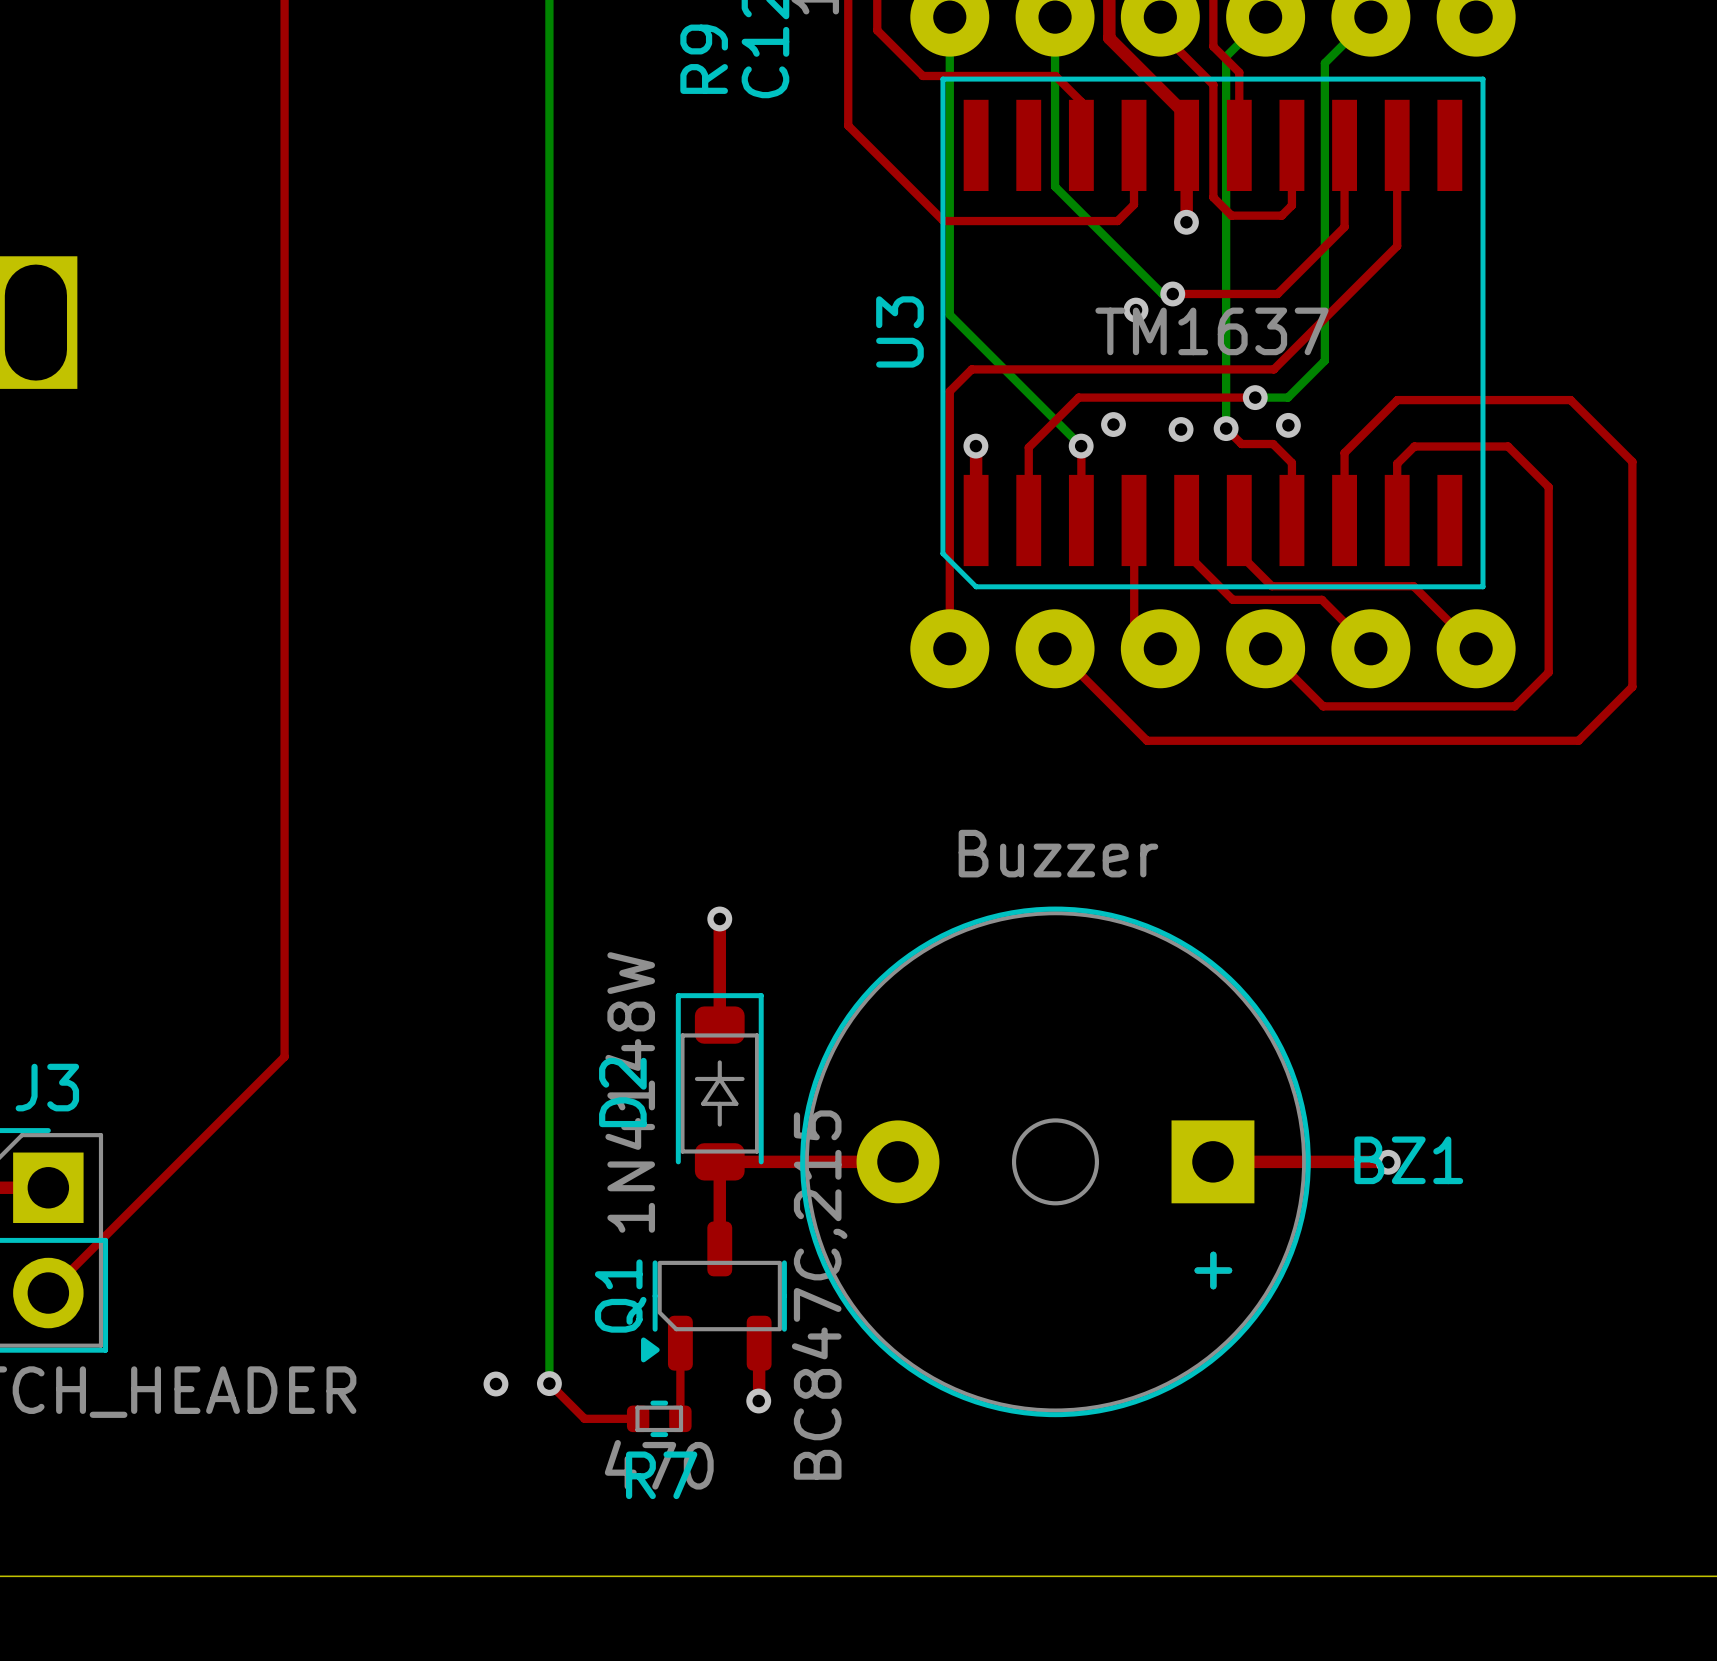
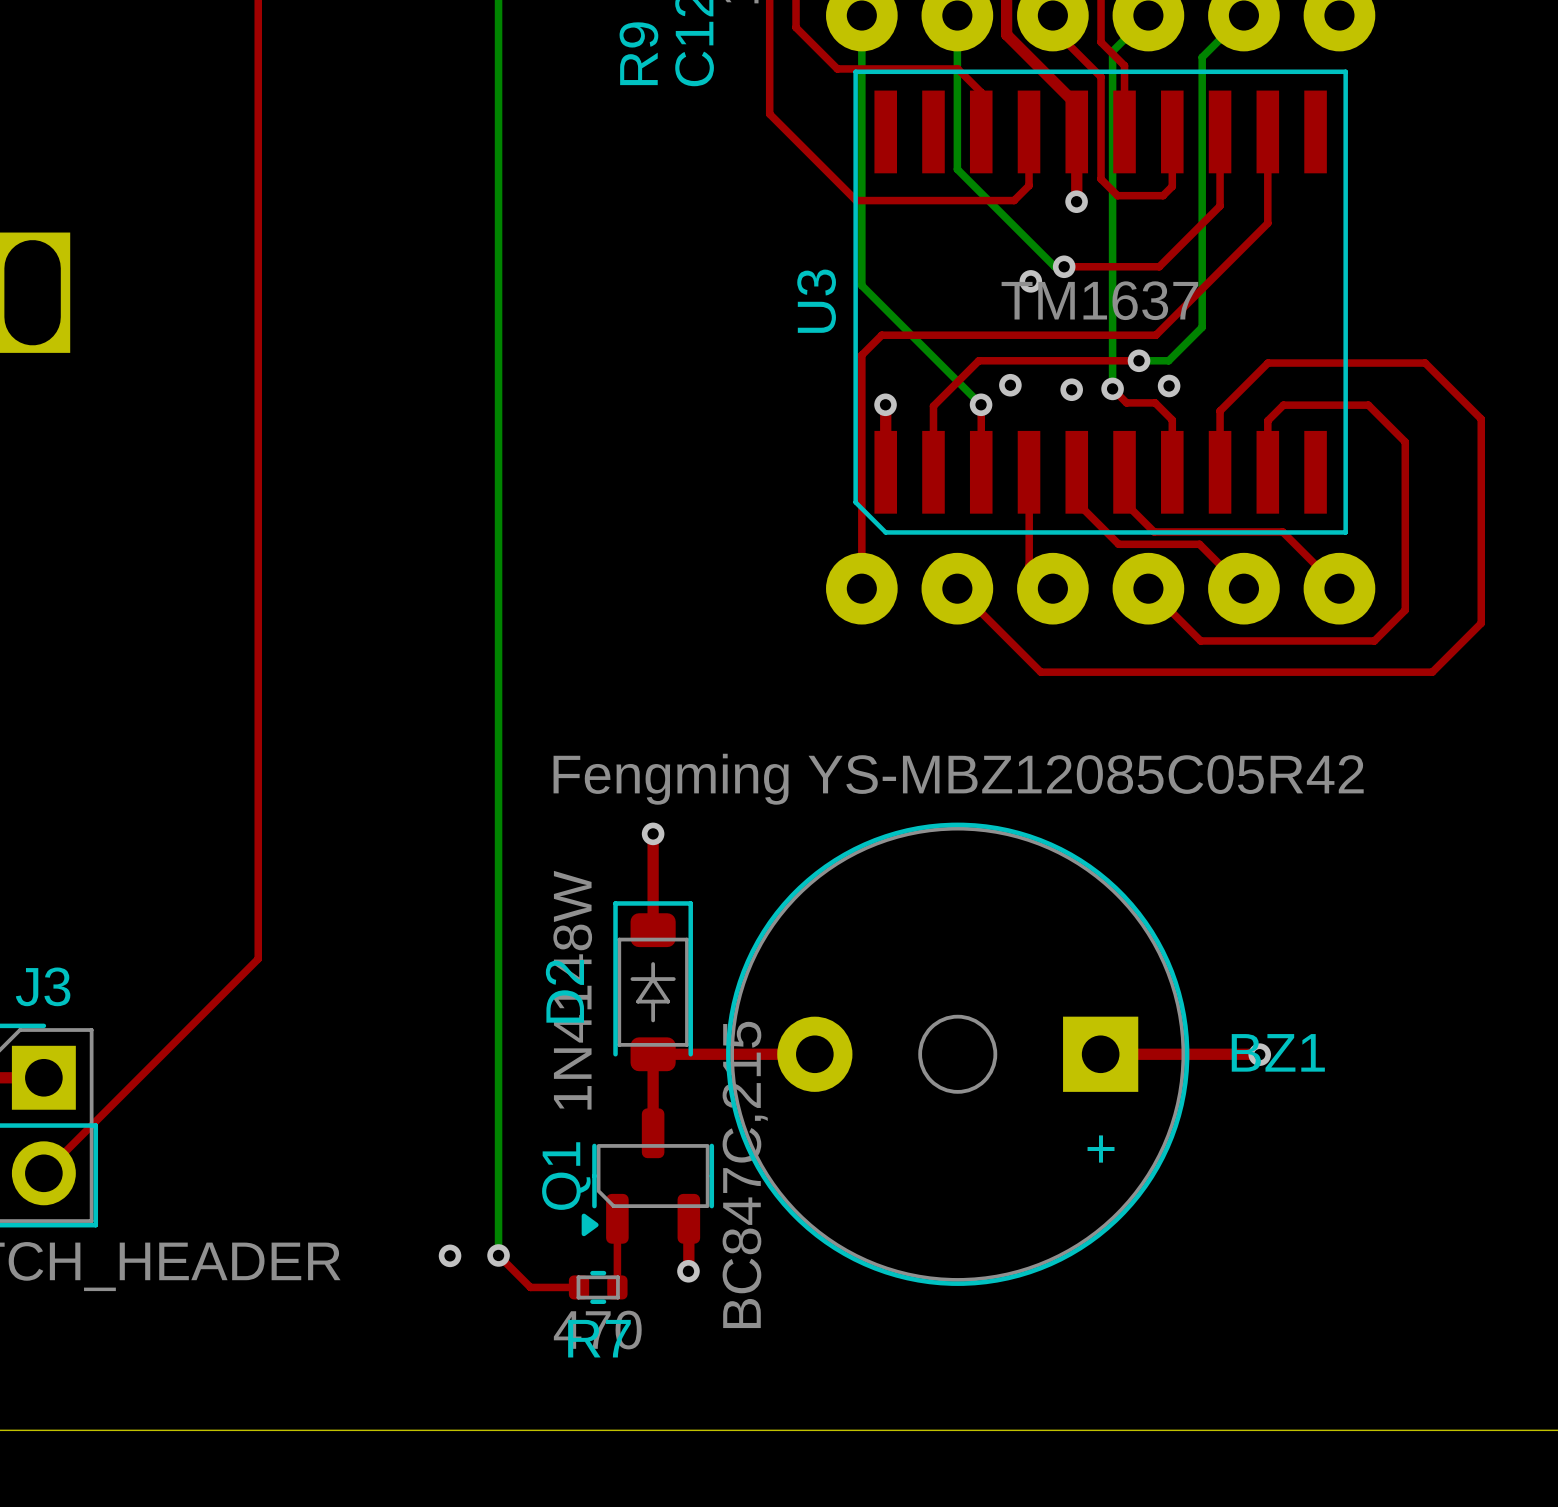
BZ1 value: Buzzer (1058, 853) -> Fengming YS-MBZ12085C05R42 (958, 779)

